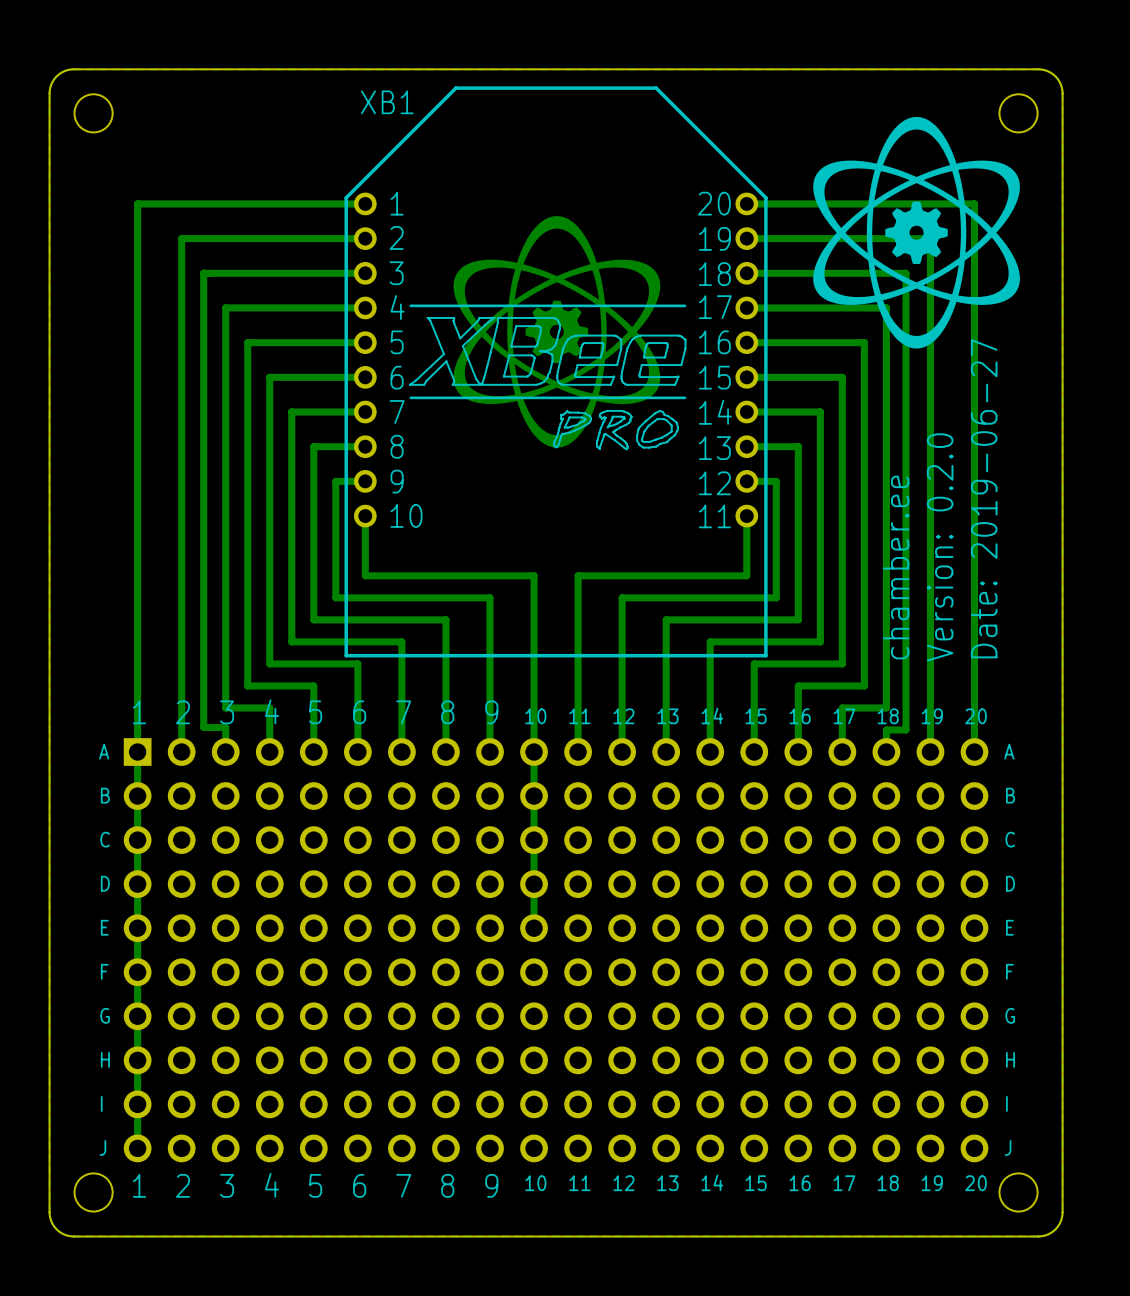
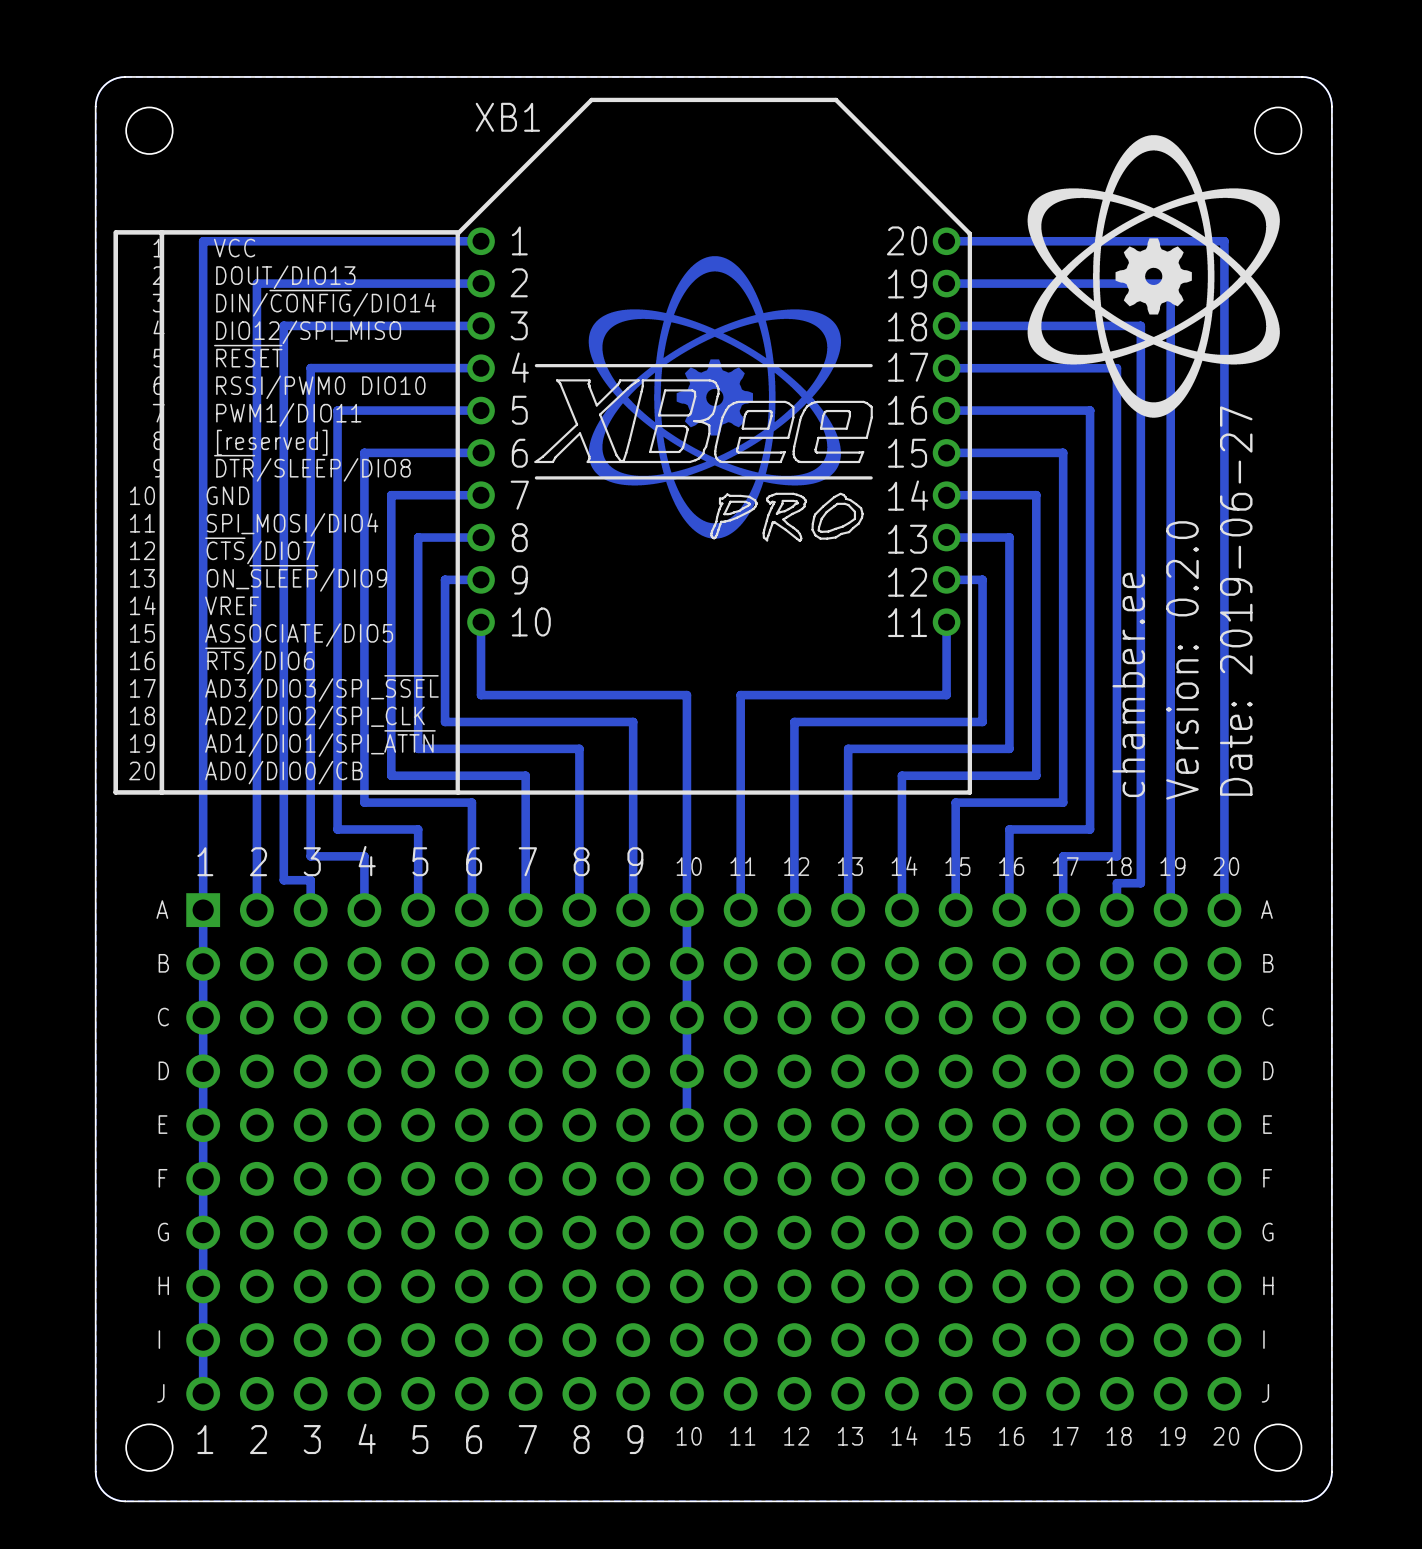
line: none -> (115, 232) (115, 792) (458, 792)
line: none -> (116, 232) (457, 232)
line: none -> (161, 232) (161, 792)
text: none -> 1 VCC (204, 248)
text: none -> 2 DOUT/DIO13 (254, 277)
text: none -> 3 DIN/~{CONFIG}/DIO14 (294, 303)
text: none -> 4 DIO12/SPI_MISO (277, 332)
text: none -> 5 ~{RESET} (218, 356)
text: none -> 6 RSSI/PWM0 DIO10 (289, 387)
text: none -> 7 PWM1/DIO11 (257, 414)
text: none -> 8 [reserved] (240, 442)
text: none -> 9 ~{DTR}/SLEEP/DIO8 (282, 468)
text: none -> 10 GND (189, 495)
text: none -> 11 SPI_MOSI/DIO4 (254, 524)
text: none -> 12 ~{CTS}/DIO7 (222, 550)
text: none -> 13 ON_~{SLEEP}/DIO9 (258, 578)
text: none -> 14 VREF (194, 605)
text: none -> 15 ASSOCIATE/DIO5 (261, 634)
text: none -> 16 ~{RTS}/DIO6 (222, 660)
text: none -> 17 AD3/DIO3/SPI_~{SSEL} (284, 688)
text: none -> 18 AD2/DIO2/SPI_CLK (277, 717)
text: none -> 19 AD1/DIO1/SPI_~{ATTN} (282, 743)
text: none -> 20 AD0/DIO0/CB (246, 772)

